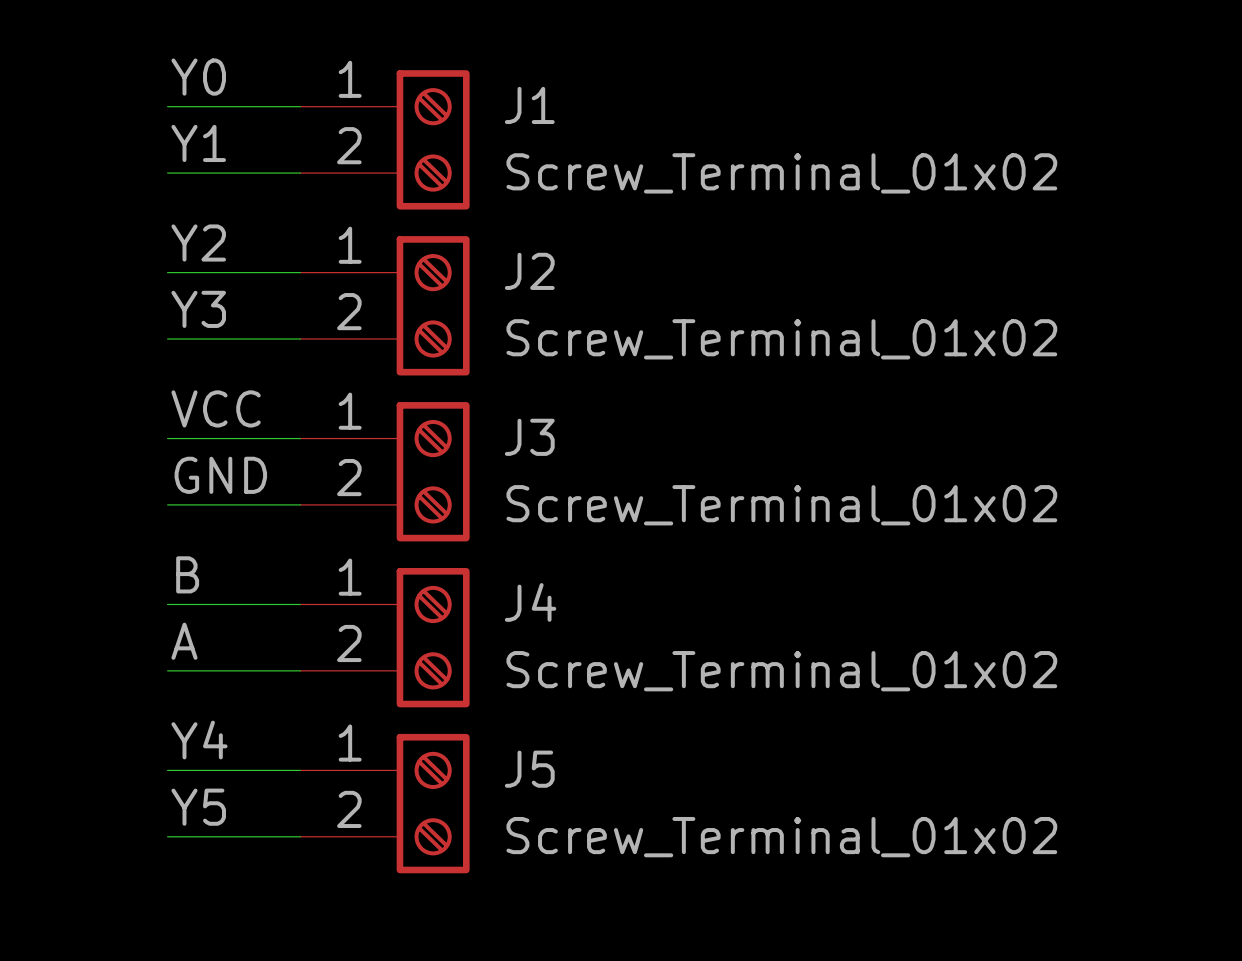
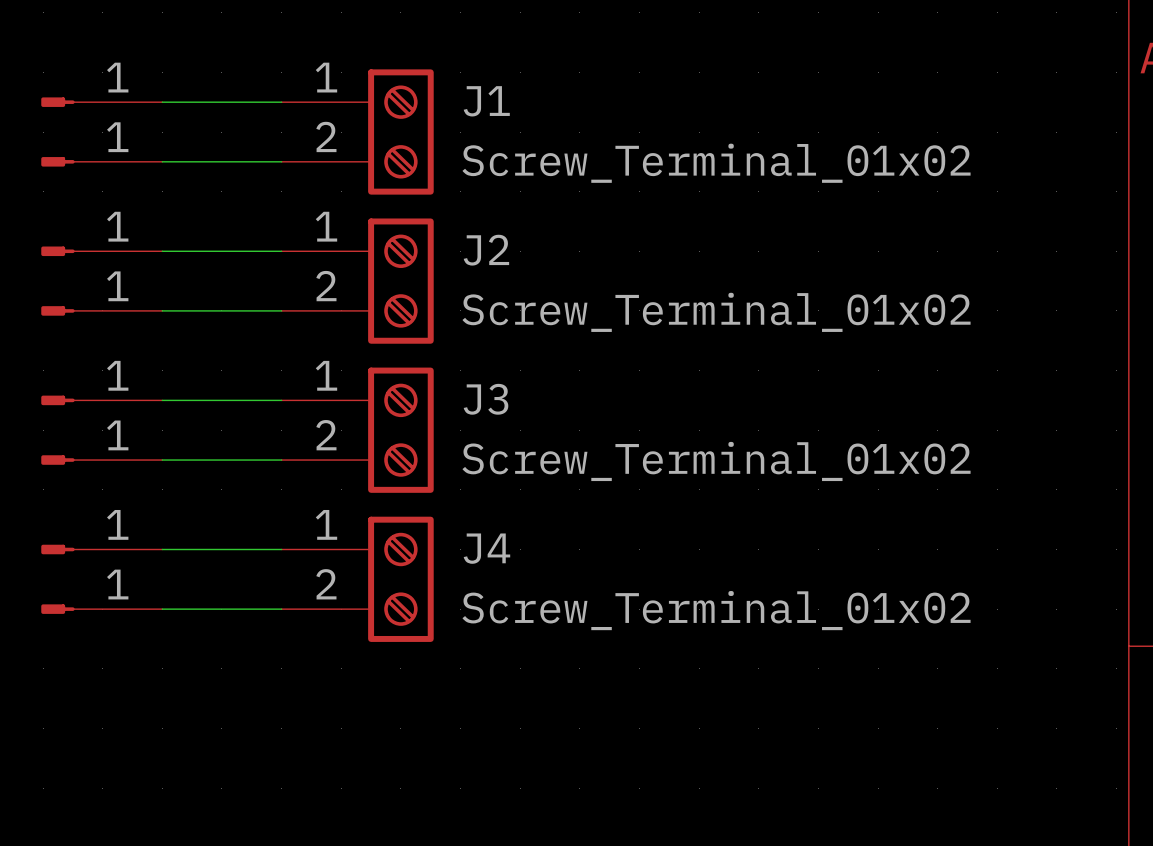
label: Y0 (198, 77) -> none
part: none -> (101, 102)
label: Y1 (198, 143) -> none
part: none -> (101, 161)
label: Y2 (198, 243) -> none
part: none -> (101, 251)
label: Y3 (198, 309) -> none
part: none -> (101, 310)
label: VCC (216, 408) -> none
part: none -> (101, 400)
label: GND (220, 475) -> none
part: none -> (101, 460)
label: B (187, 574) -> none
part: none -> (101, 549)
label: A (184, 641) -> none
part: none -> (101, 609)
label: Y4 (199, 740) -> none
wire: (167, 770) (300, 770) -> none
J5: Screw_Terminal_01x02 (385, 803) -> none
label: Y5 (198, 807) -> none
wire: (167, 836) (300, 836) -> none

